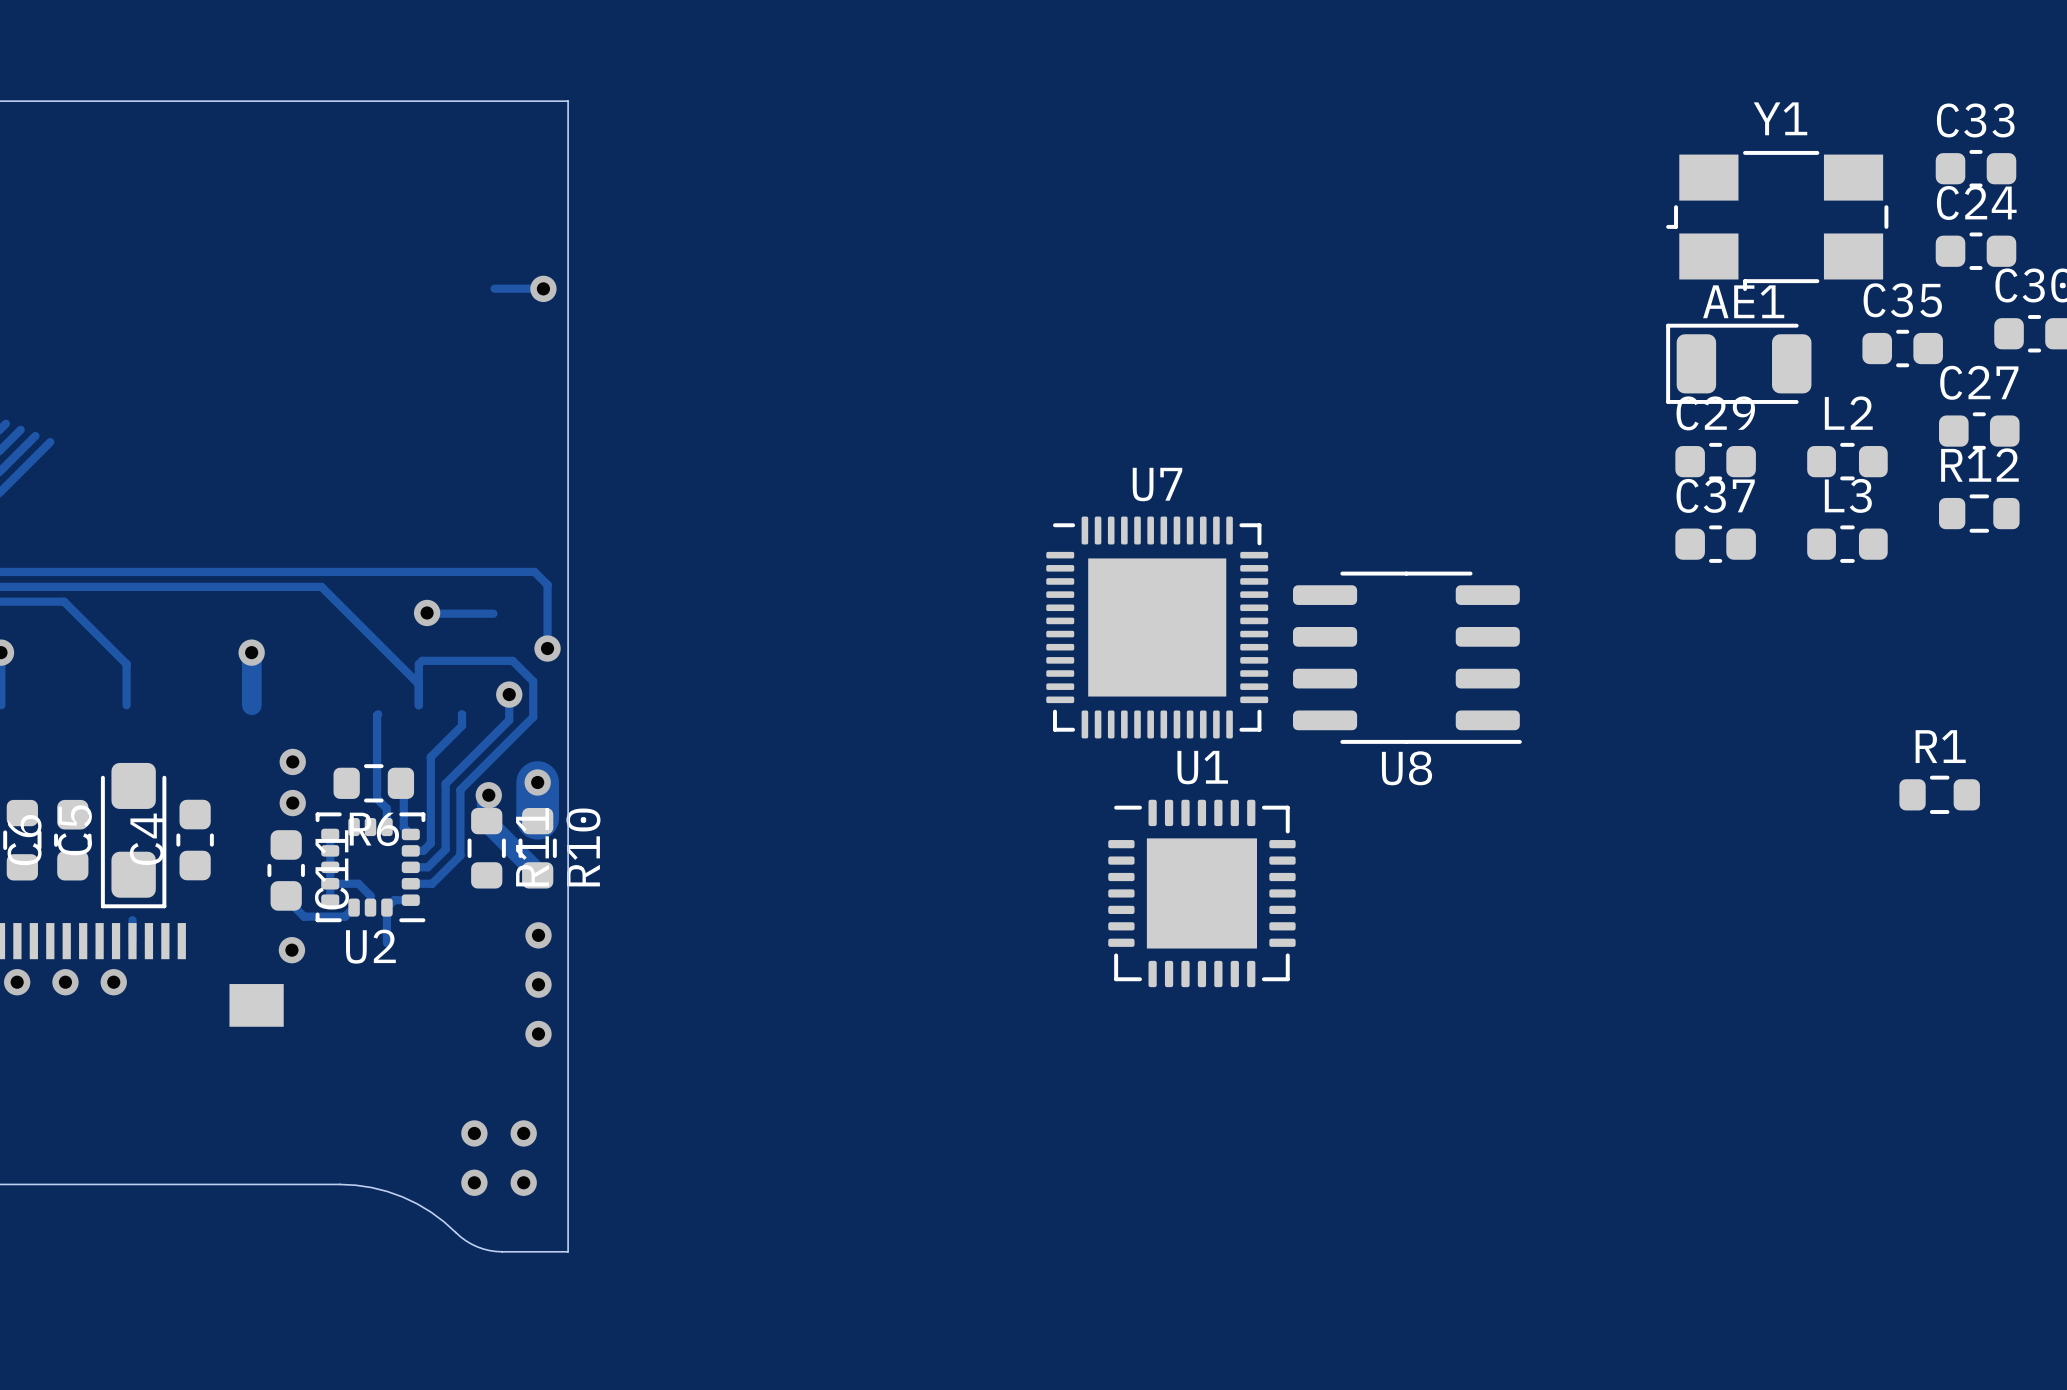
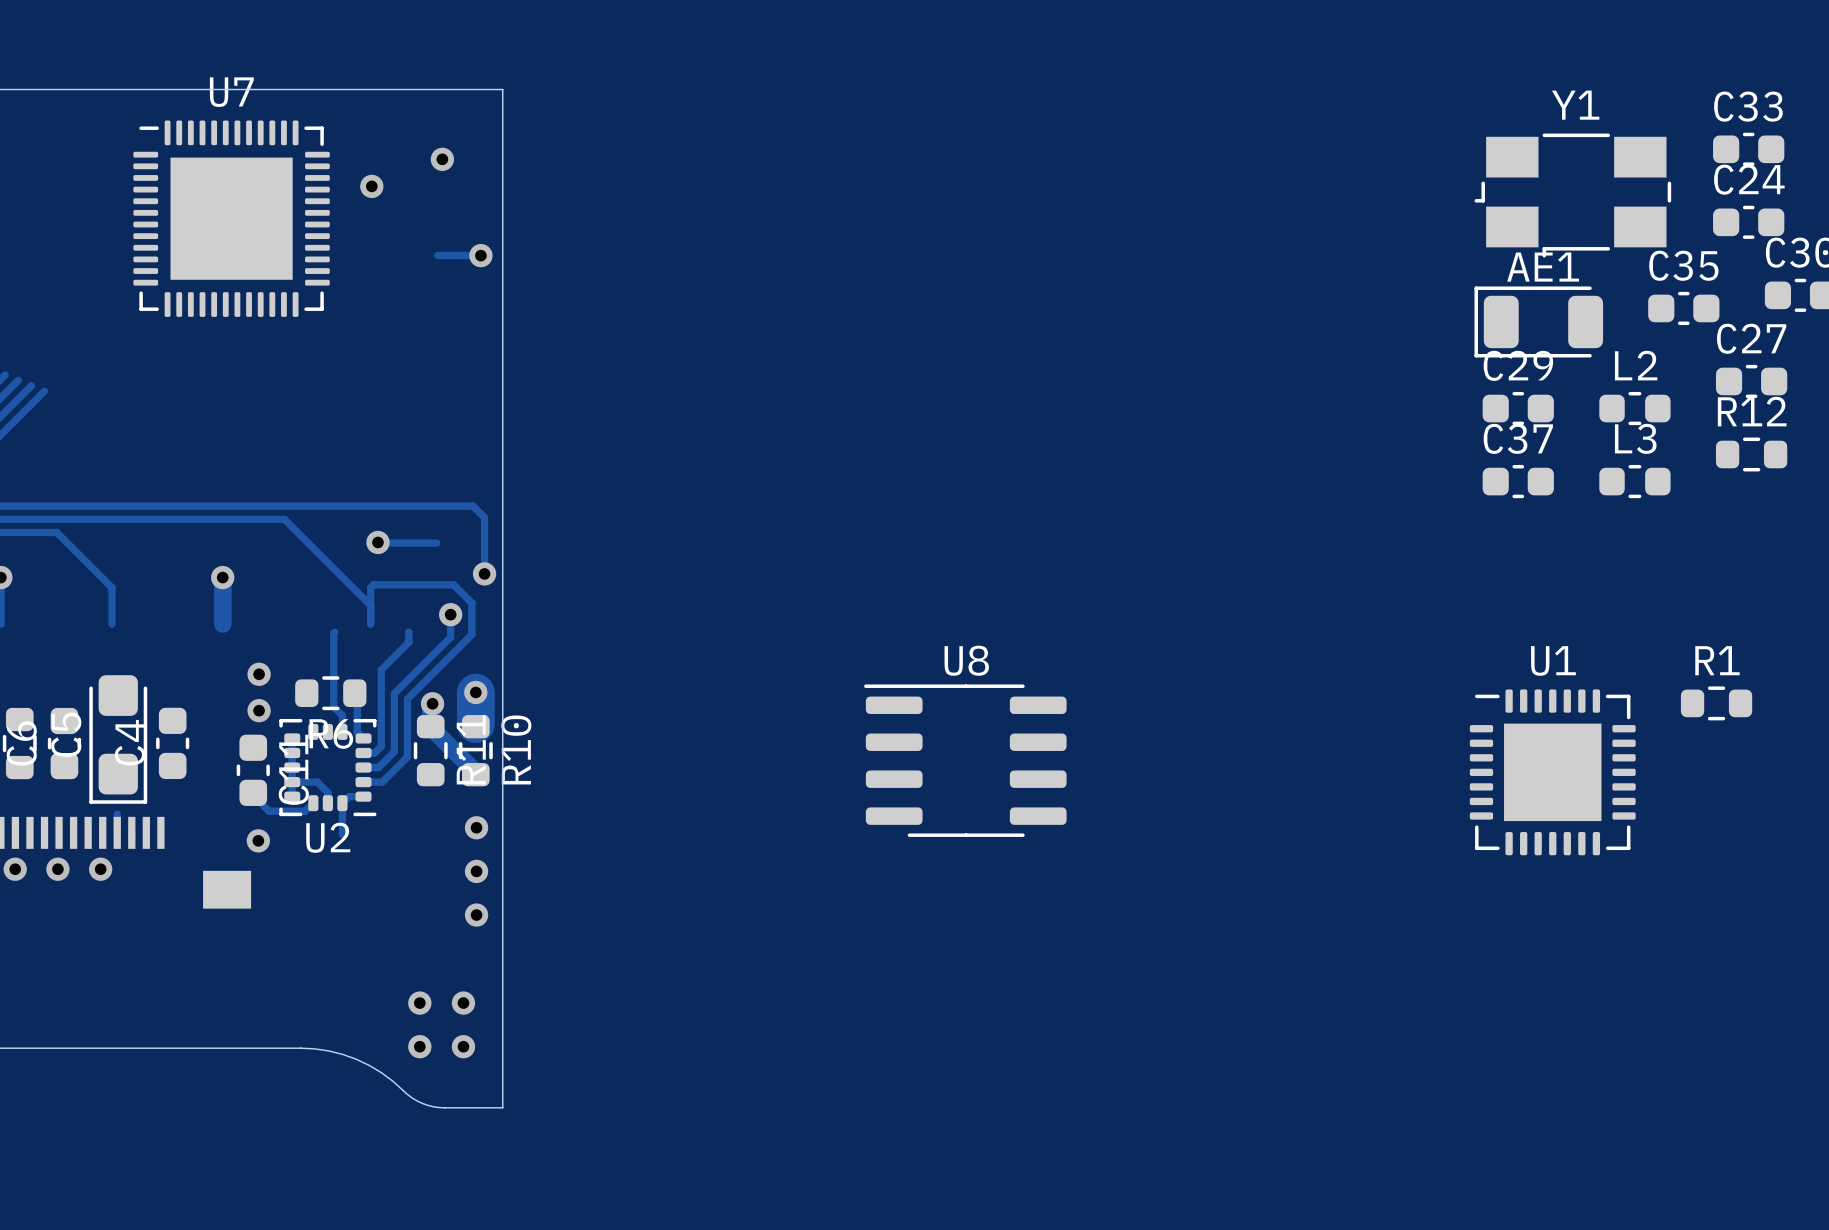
via: none -> (442, 159)
via: none -> (371, 186)
U7 position: (1157, 627) -> (231, 218)
U8 rotation: 0° (1407, 657) -> 180° (965, 760)
U8 position: (1407, 657) -> (965, 760)
U1 position: (1201, 893) -> (1552, 772)

